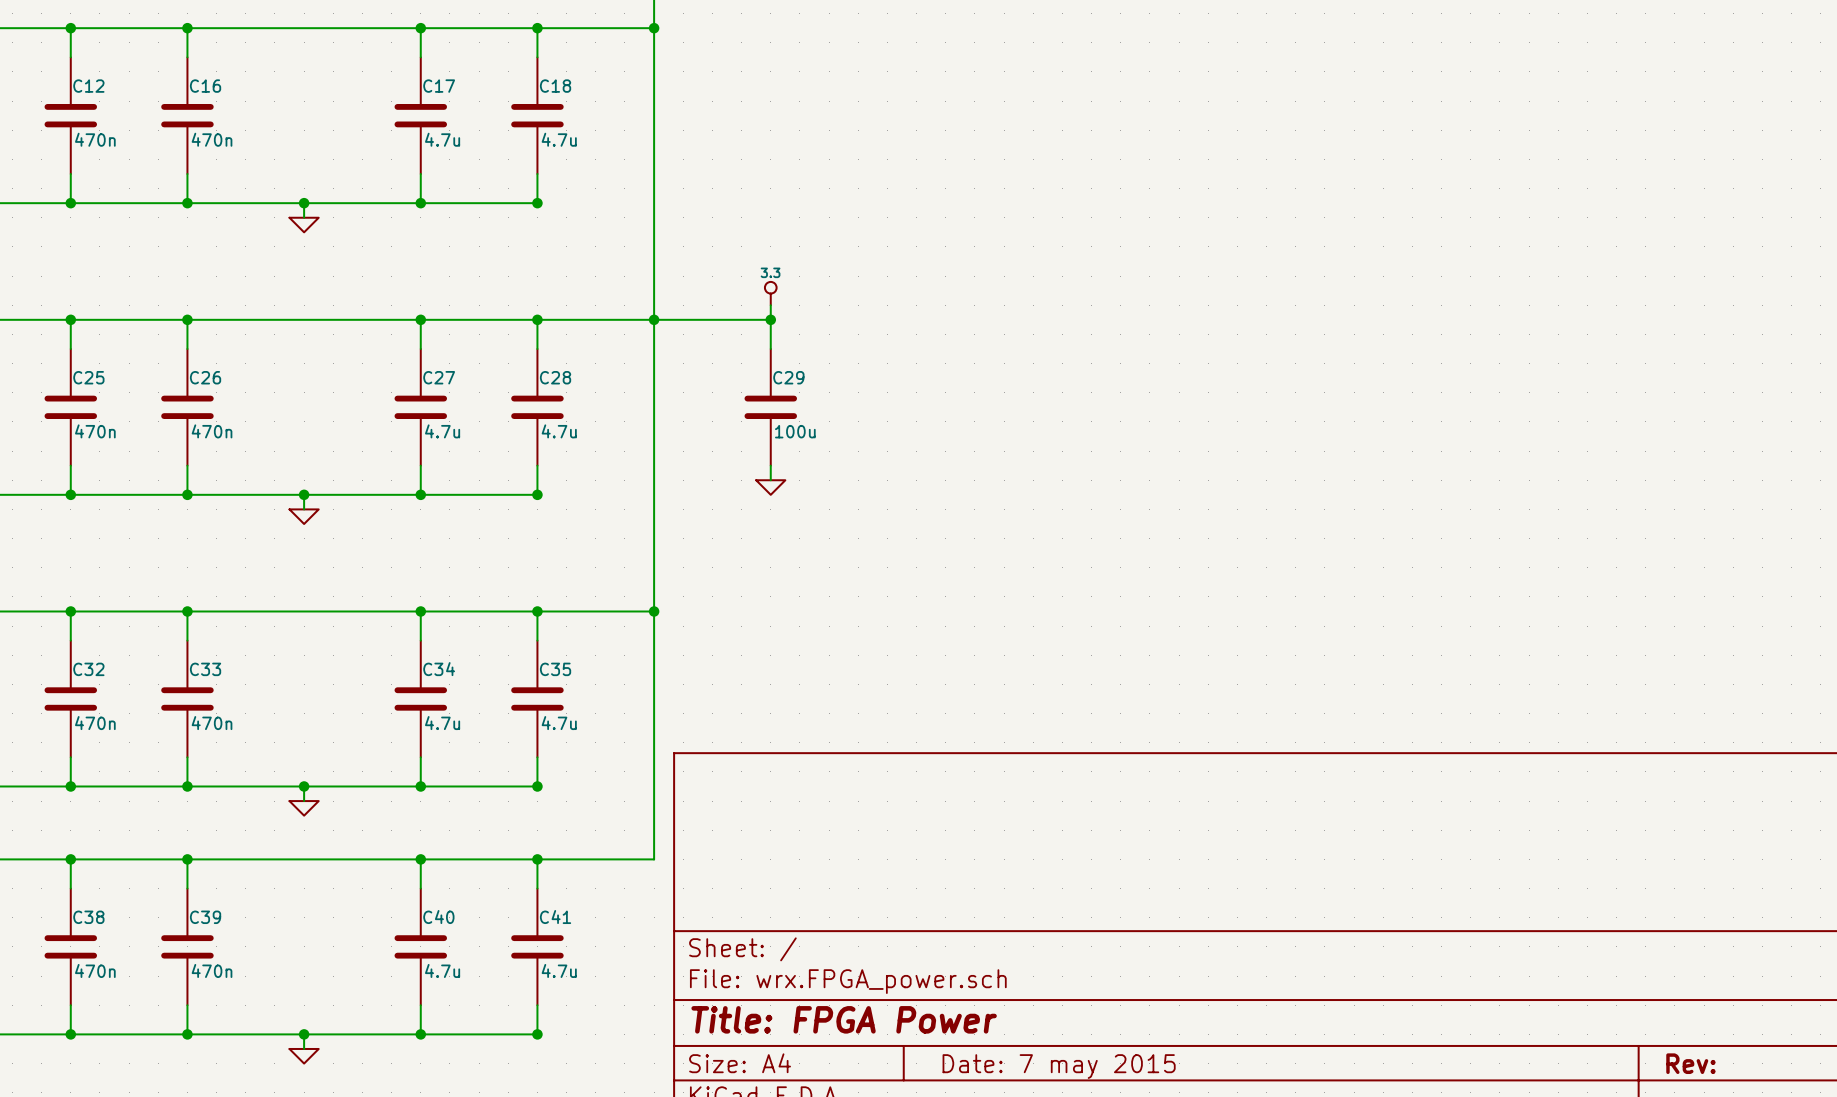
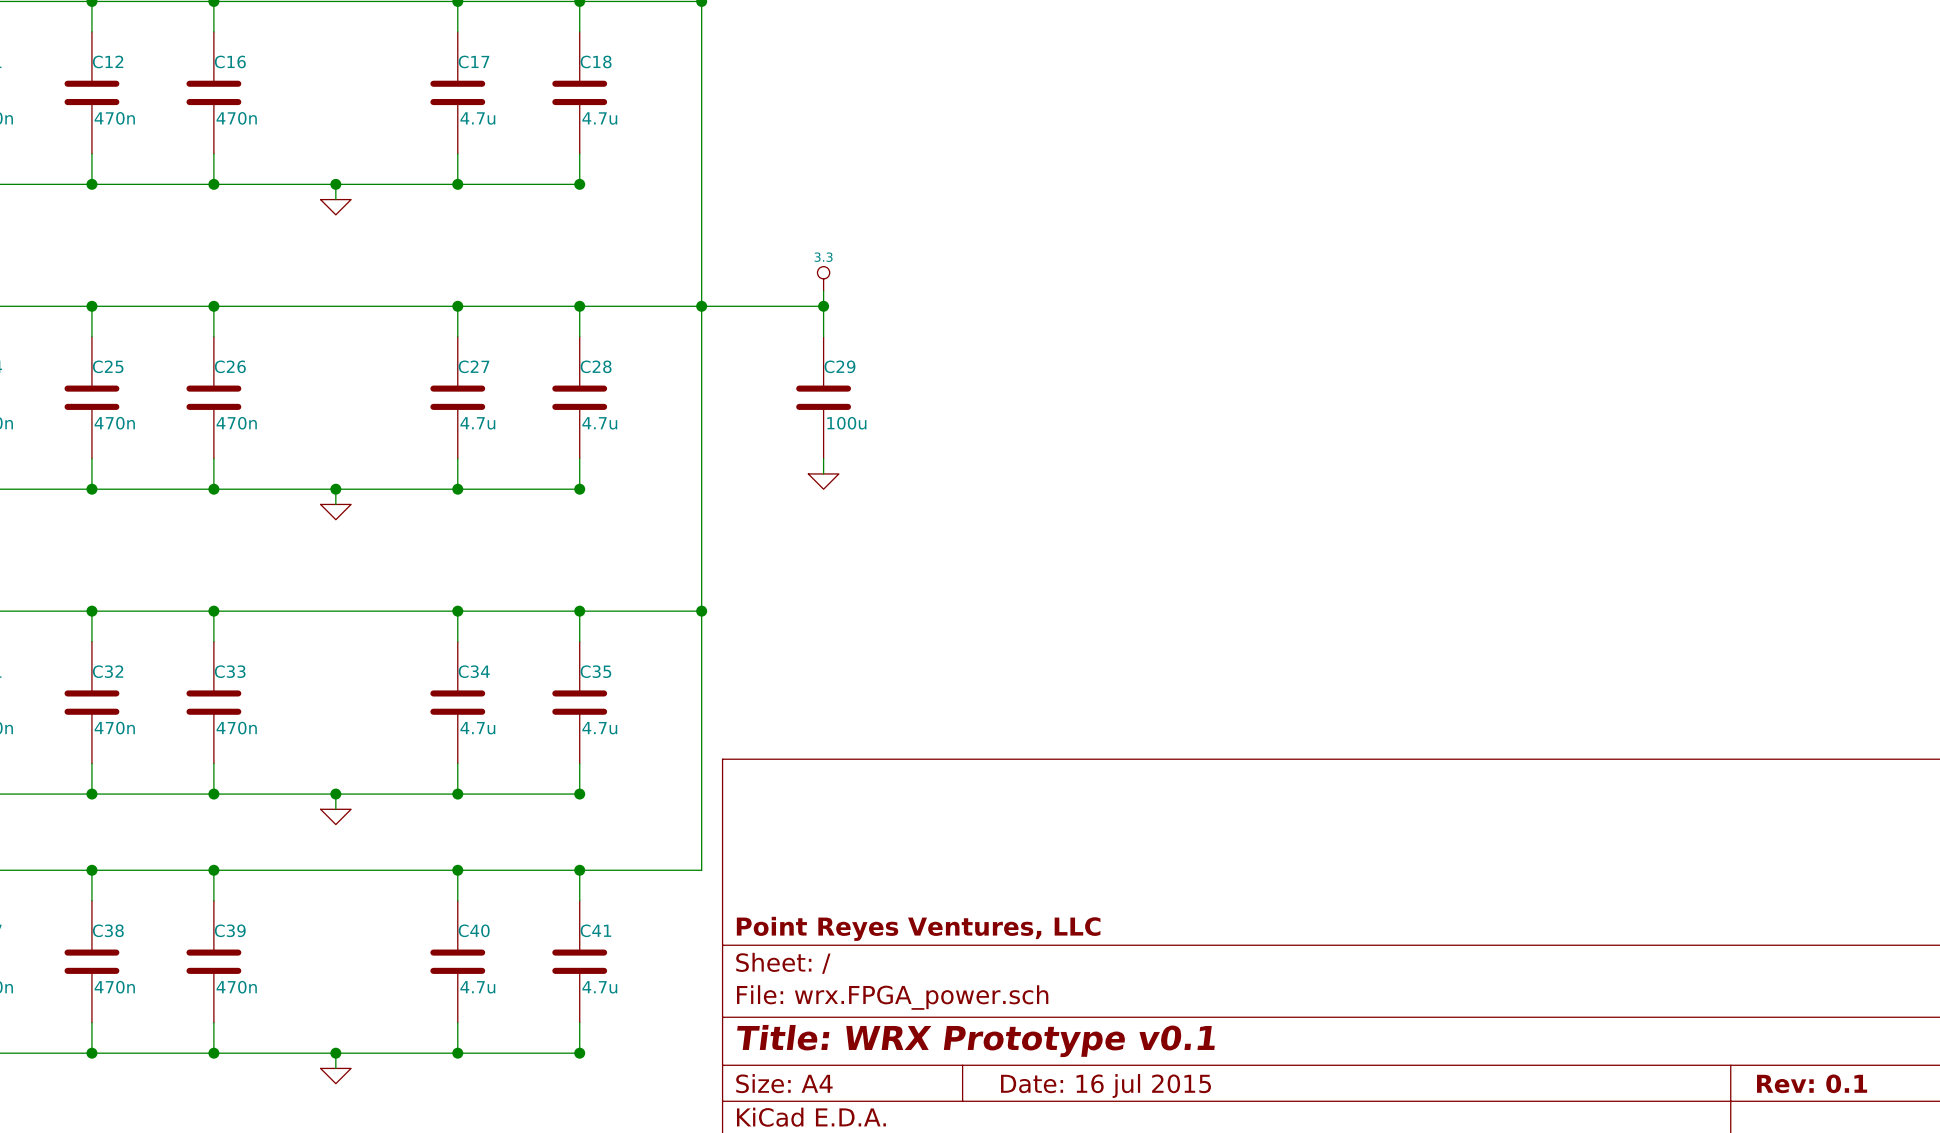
title block: none -> Point Reyes Ventures, LLC (918, 928)
title block: Title: FPGA Power (844, 1019) -> Title: WRX Prototype v0.1 (975, 1041)
title block: Rev: (1690, 1063) -> Rev: 0.1 (1812, 1083)
title block: Date: 7 may 2015 (1059, 1066) -> Date: 16 jul 2015 (1106, 1085)

